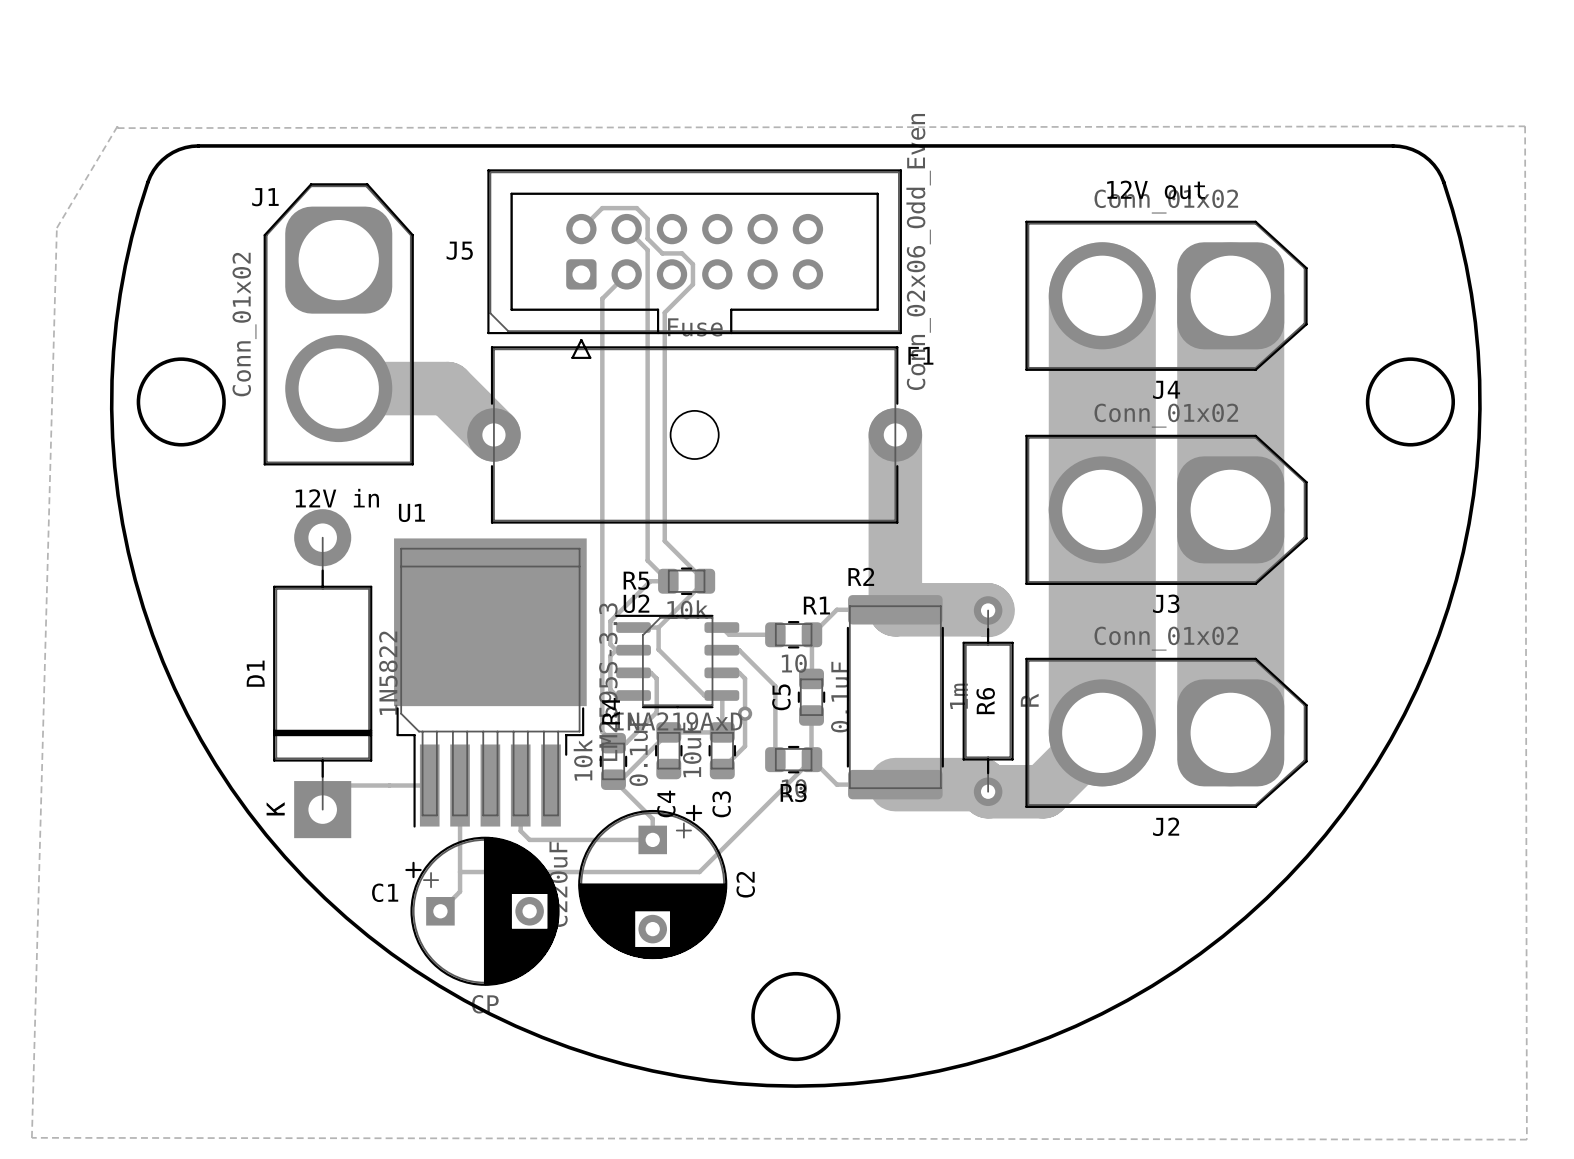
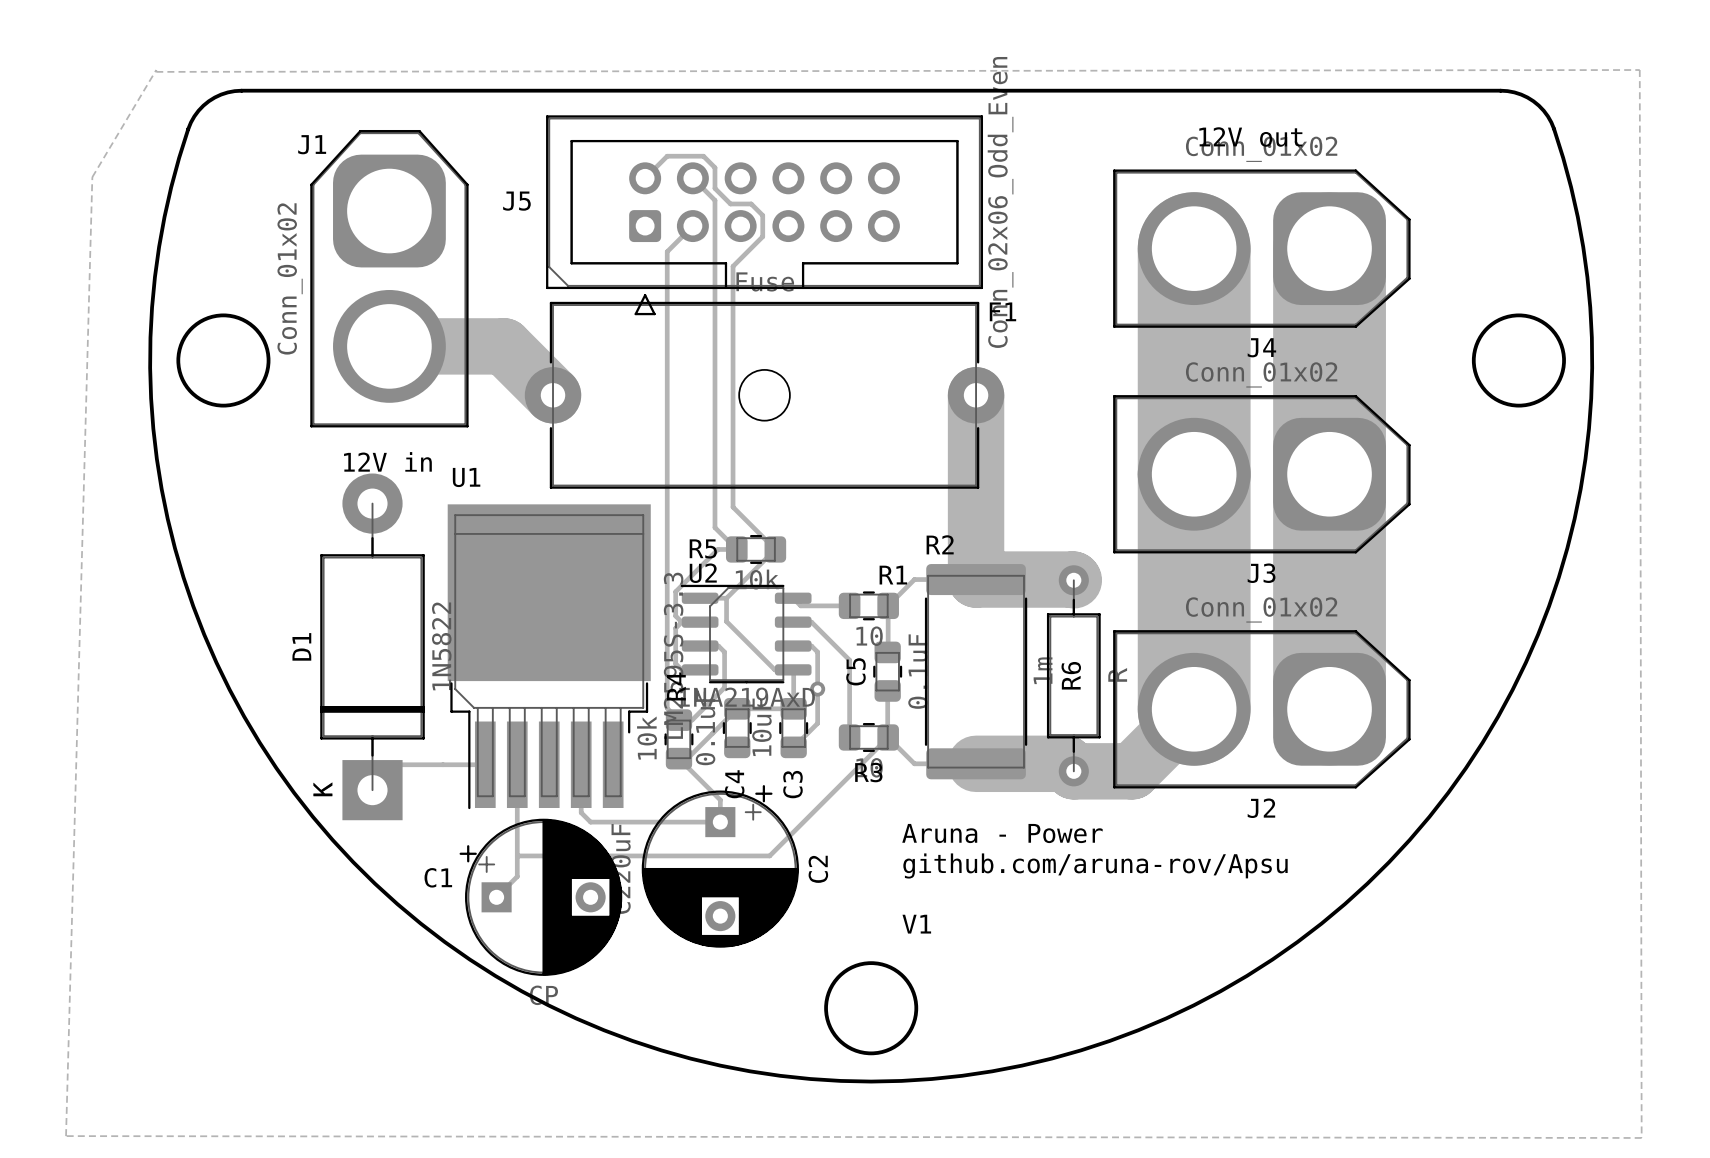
text: none -> Aruna - Power (1002, 833)
text: none -> github.com/aruna-rov/Apsu (1095, 865)
text: none -> V1 (916, 924)

